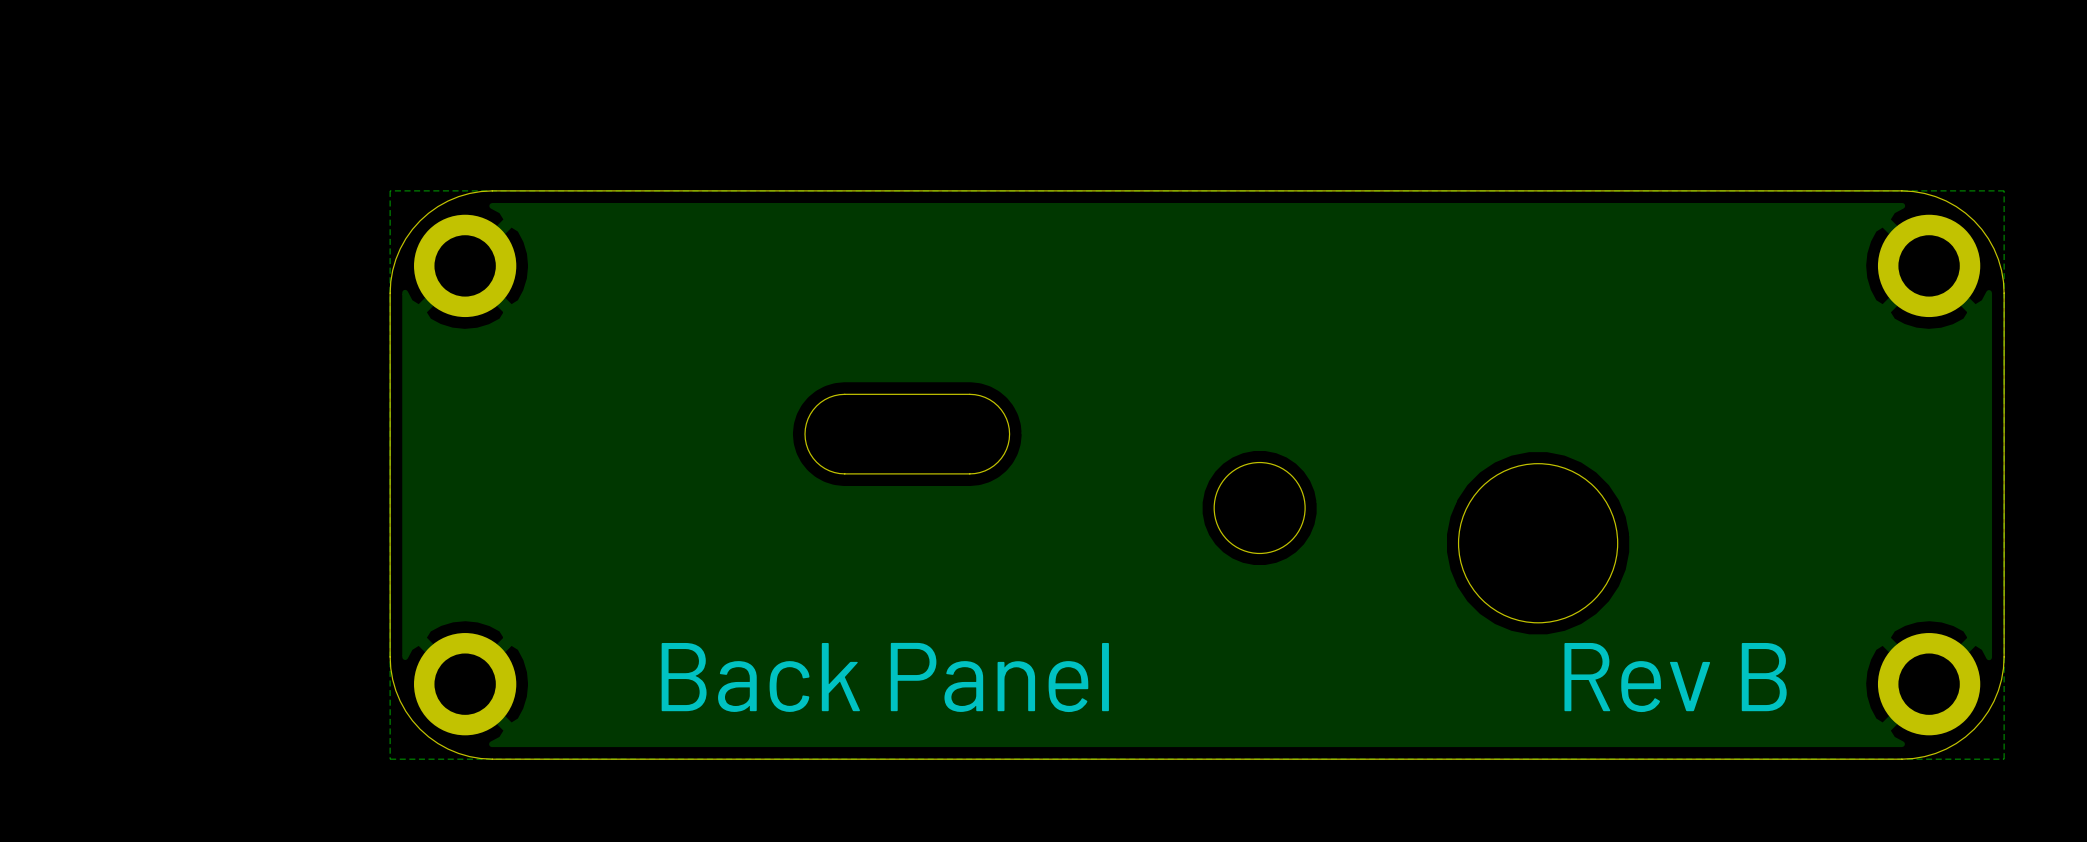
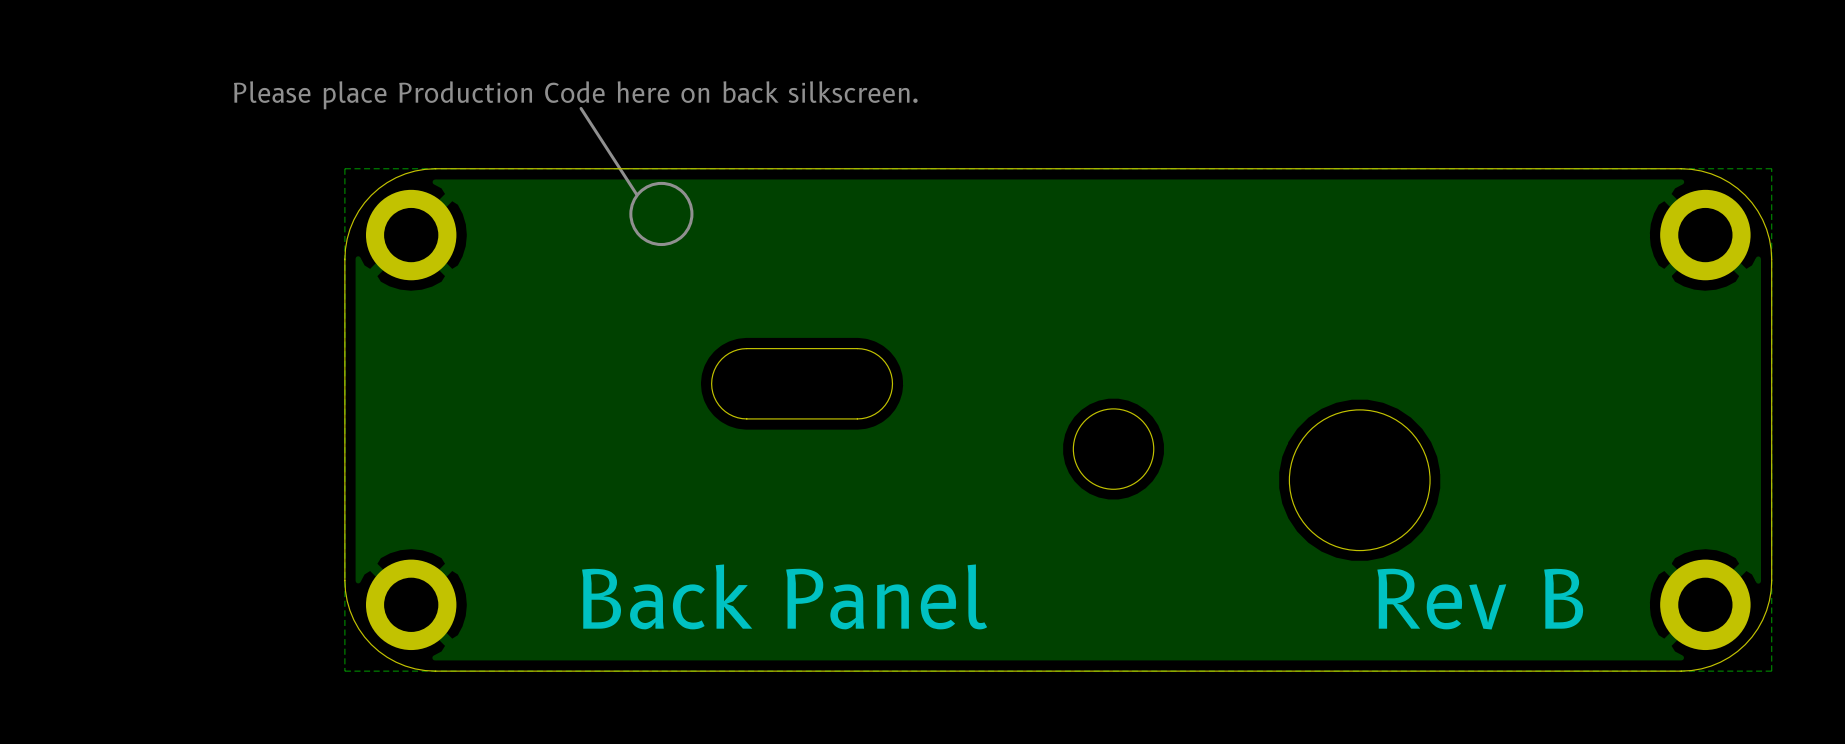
text: none -> Please place Production Code here on back silkscreen. (575, 95)
line: none -> (581, 108) (636, 193)
drawing: none -> [629, 181, 694, 247]

